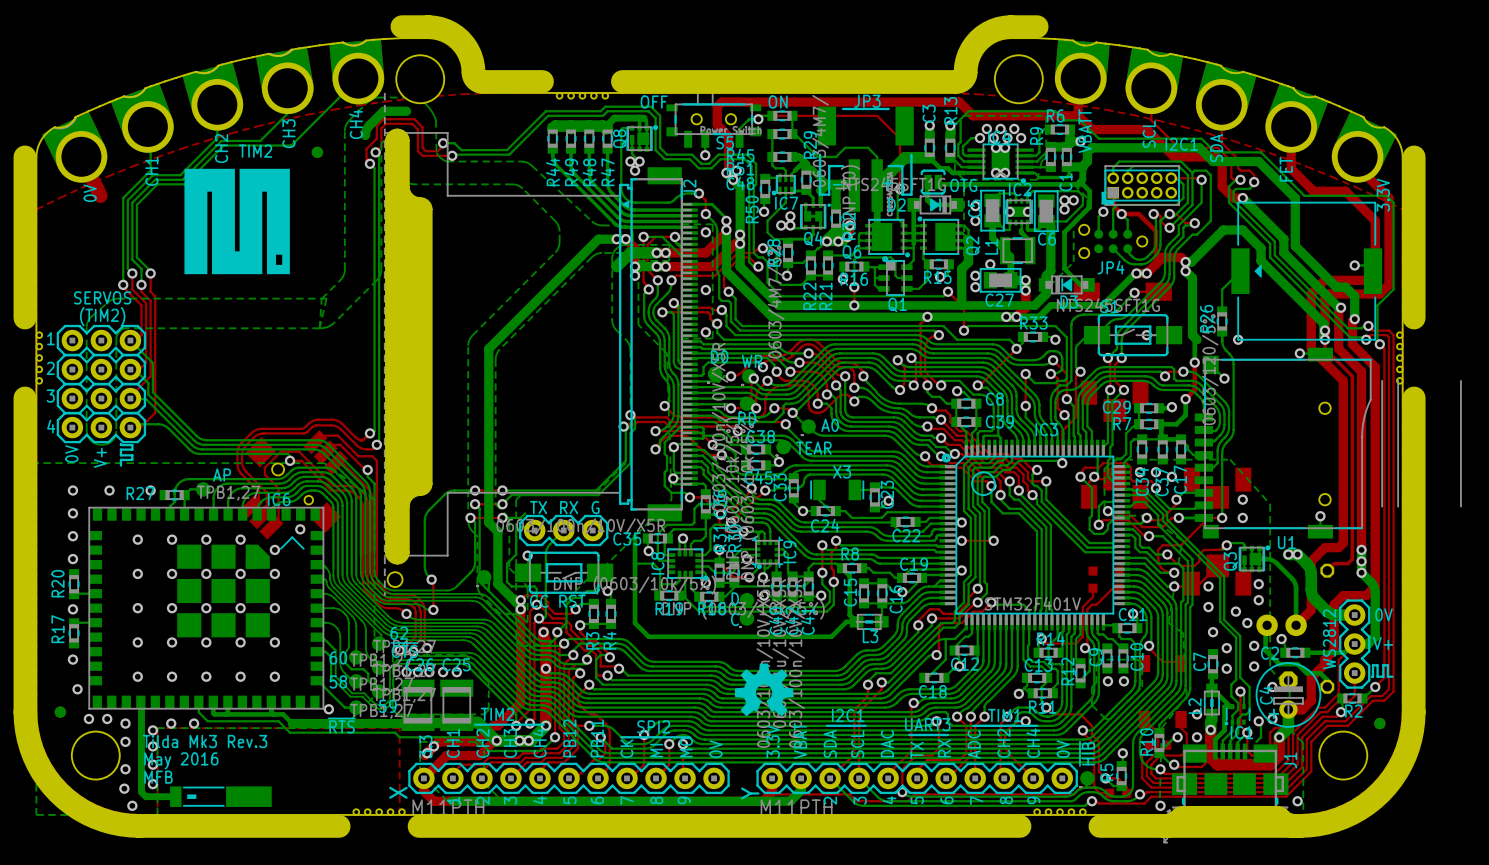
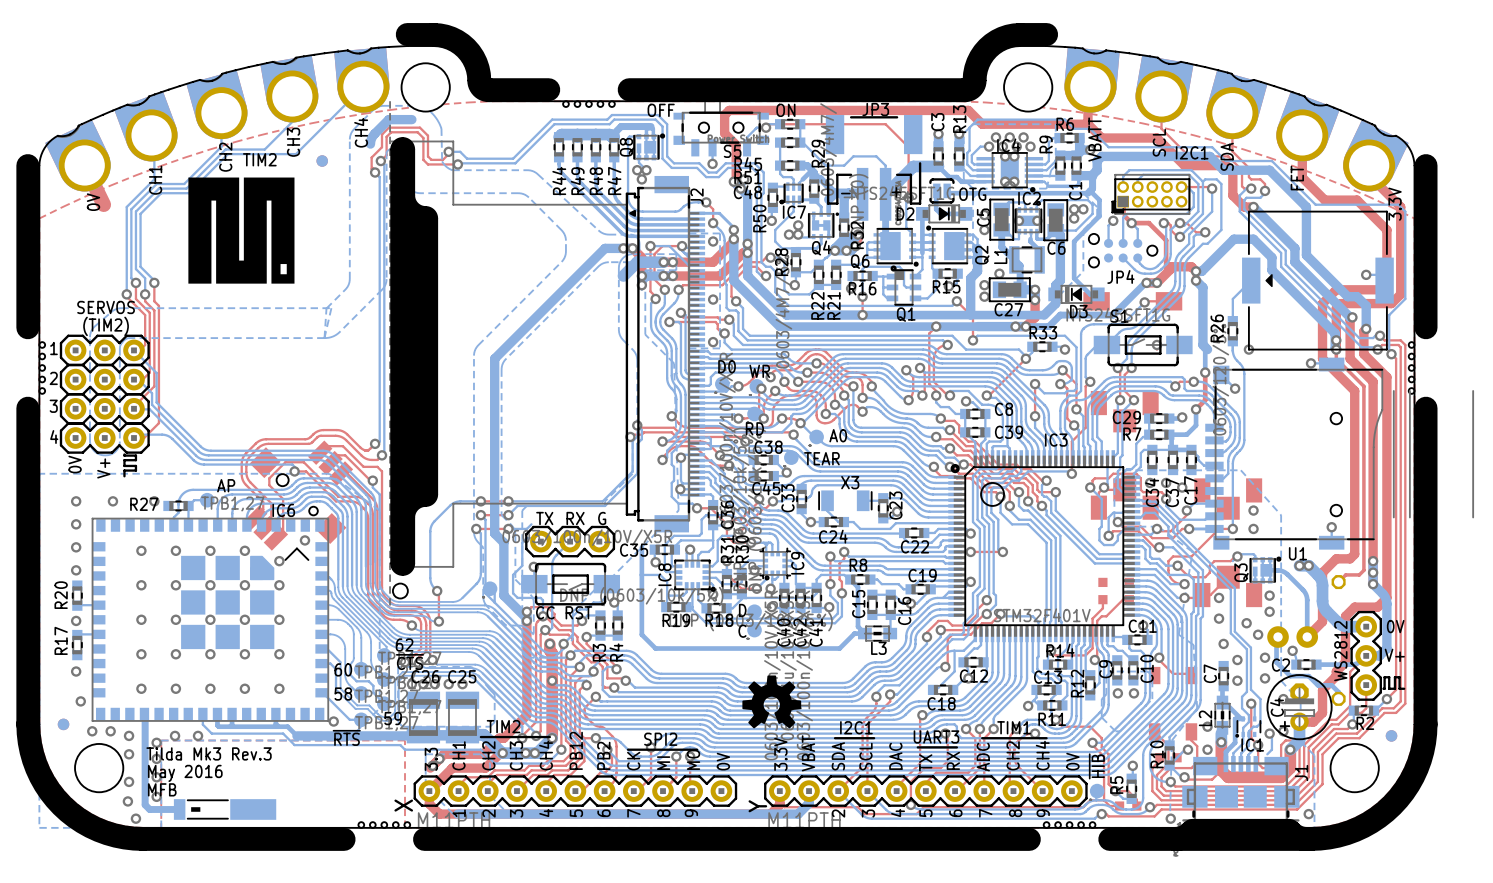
text: PB11 (597, 738) -> PB2 (603, 755)

